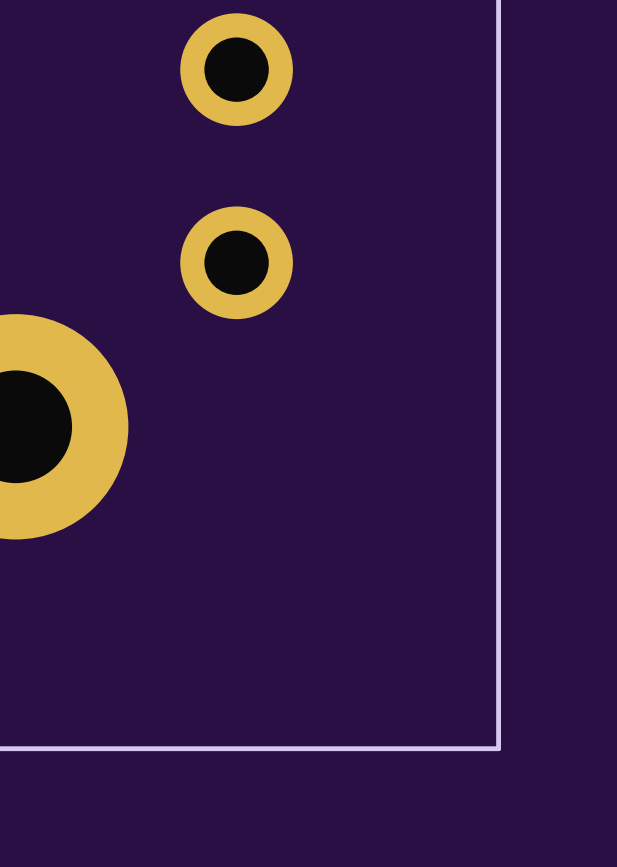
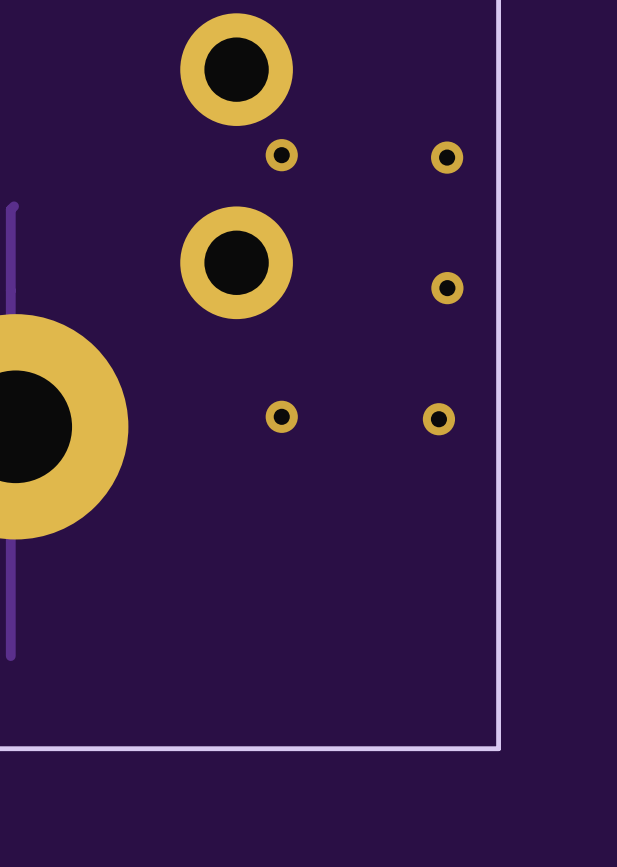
via: none -> (281, 155)
via: none -> (447, 157)
track: none -> (14, 206) (10, 209) (10, 656)
via: none -> (447, 288)
via: none -> (281, 416)
via: none -> (438, 419)

